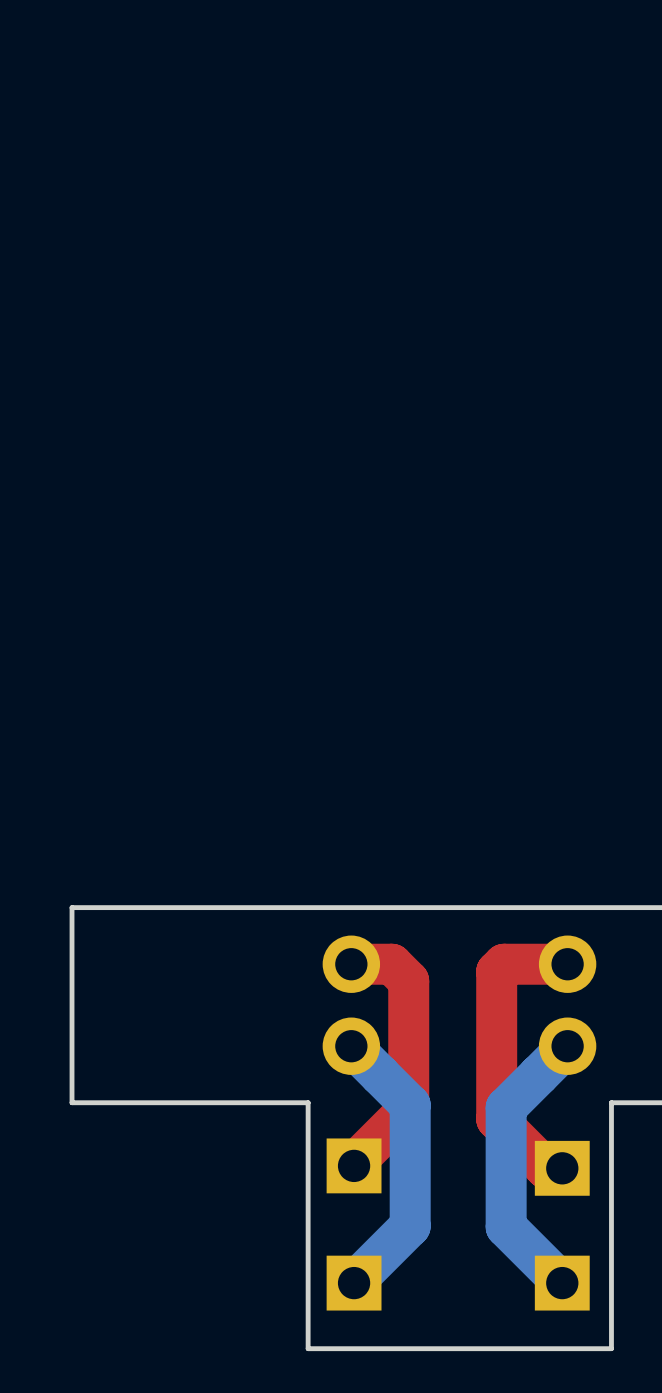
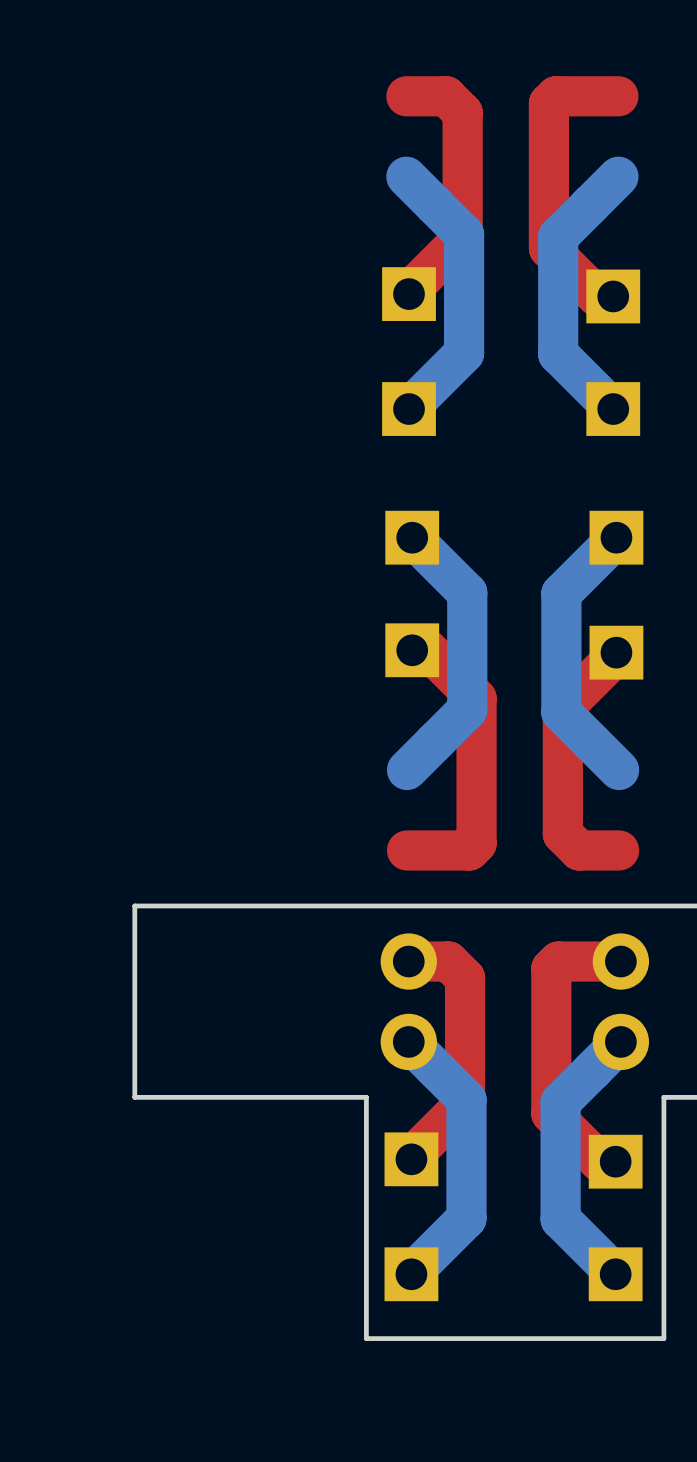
top track: none -> (406, 96) (446, 96) (462, 112) (462, 237) (409, 291) (409, 294)
top track: none -> (618, 96) (556, 96) (548, 103) (548, 248) (597, 296) (613, 296)
bottom track: none -> (406, 176) (464, 234) (464, 353) (409, 409)
bottom track: none -> (618, 176) (558, 236) (558, 353) (613, 409)
part: none -> (409, 294)
part: none -> (613, 296)
part: none -> (409, 409)
part: none -> (613, 409)
bottom track: none -> (412, 537) (467, 592) (467, 709) (406, 770)
part: none -> (412, 537)
bottom track: none -> (616, 537) (561, 593) (561, 712) (619, 770)
part: none -> (616, 537)
top track: none -> (412, 650) (428, 650) (476, 698) (476, 843) (469, 850) (406, 850)
part: none -> (412, 650)
top track: none -> (616, 652) (616, 655) (562, 708) (562, 833) (579, 850) (619, 850)
part: none -> (616, 652)

